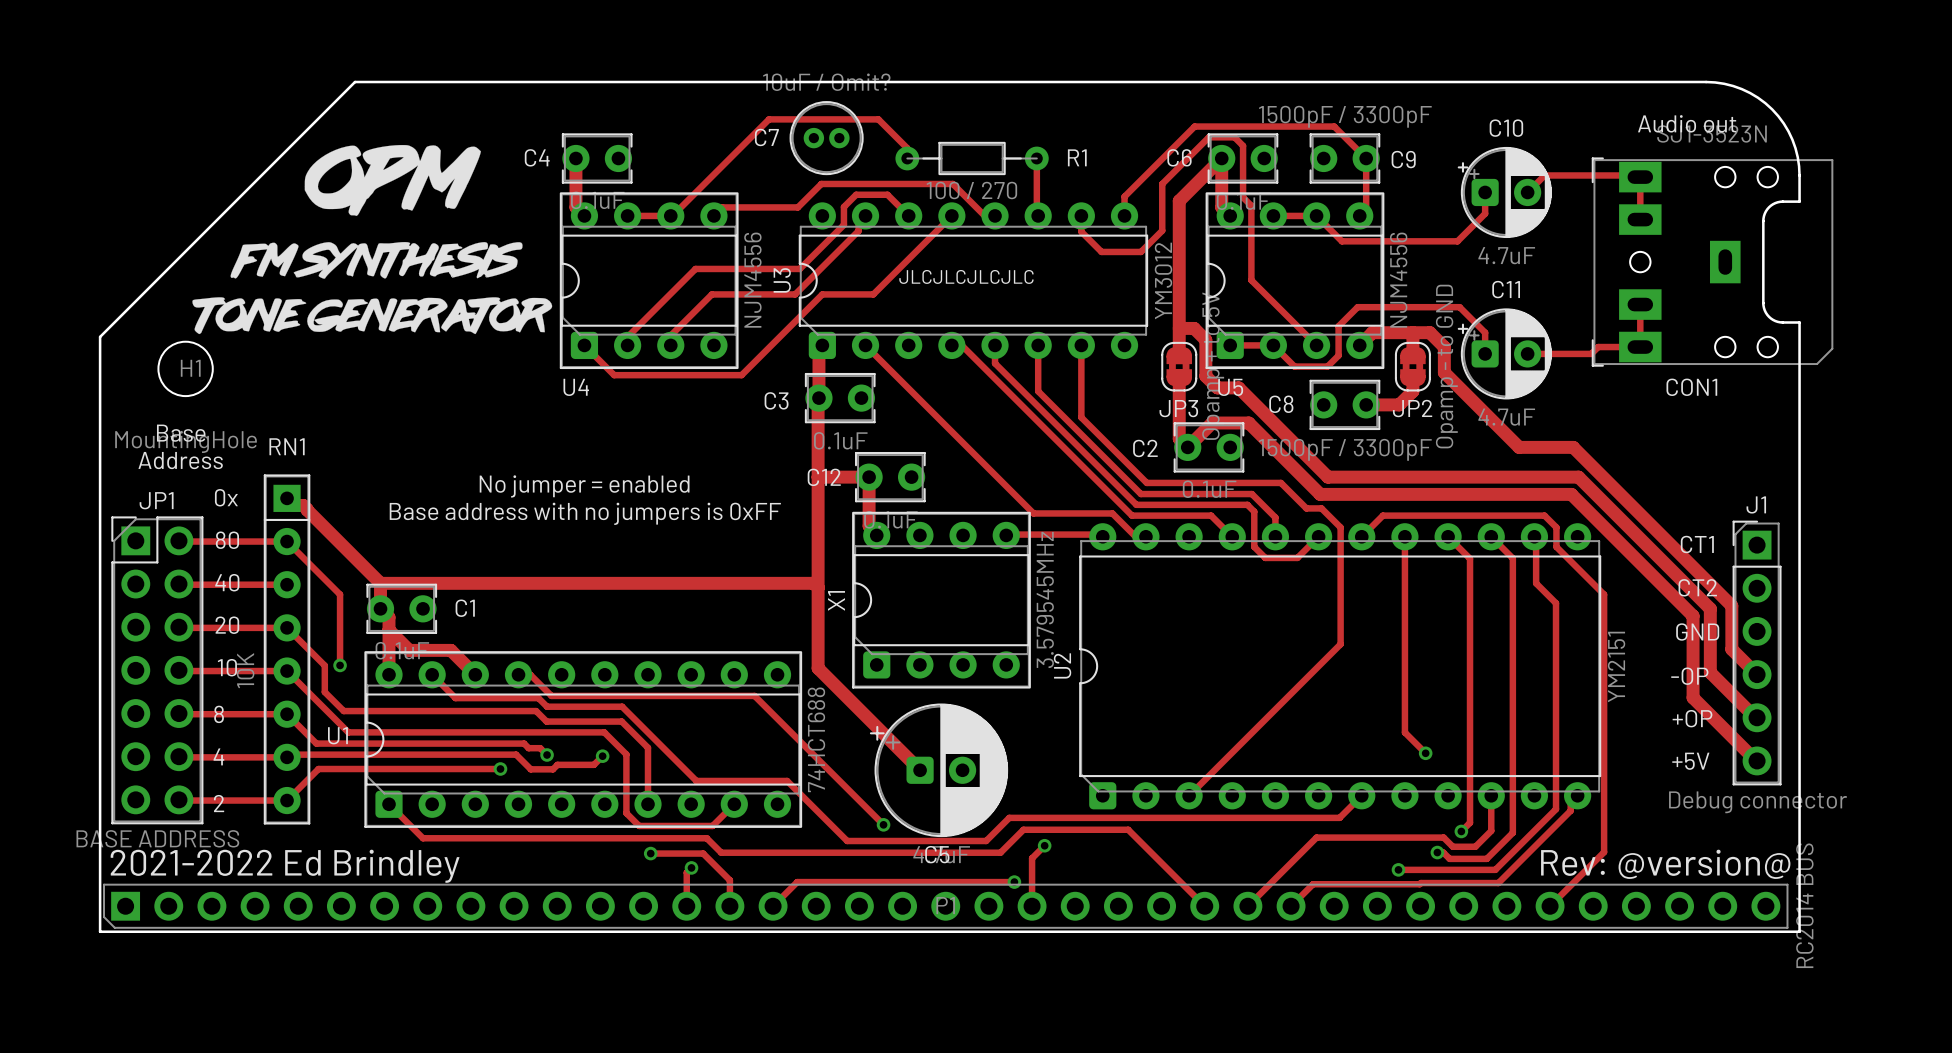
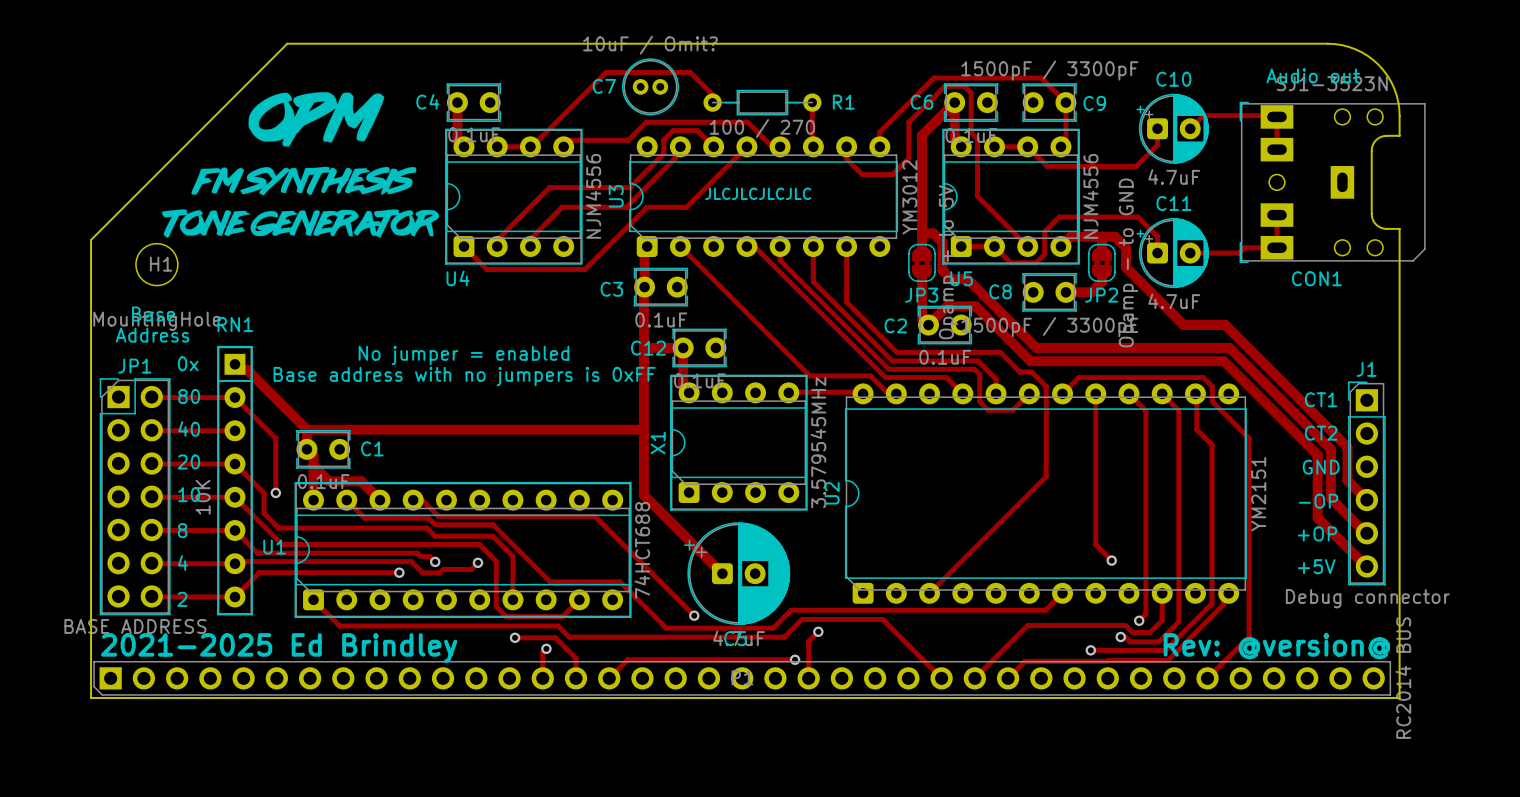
text: 2021-2022 Ed Brindley (285, 866) -> 2021-2025 Ed Brindley (279, 648)

